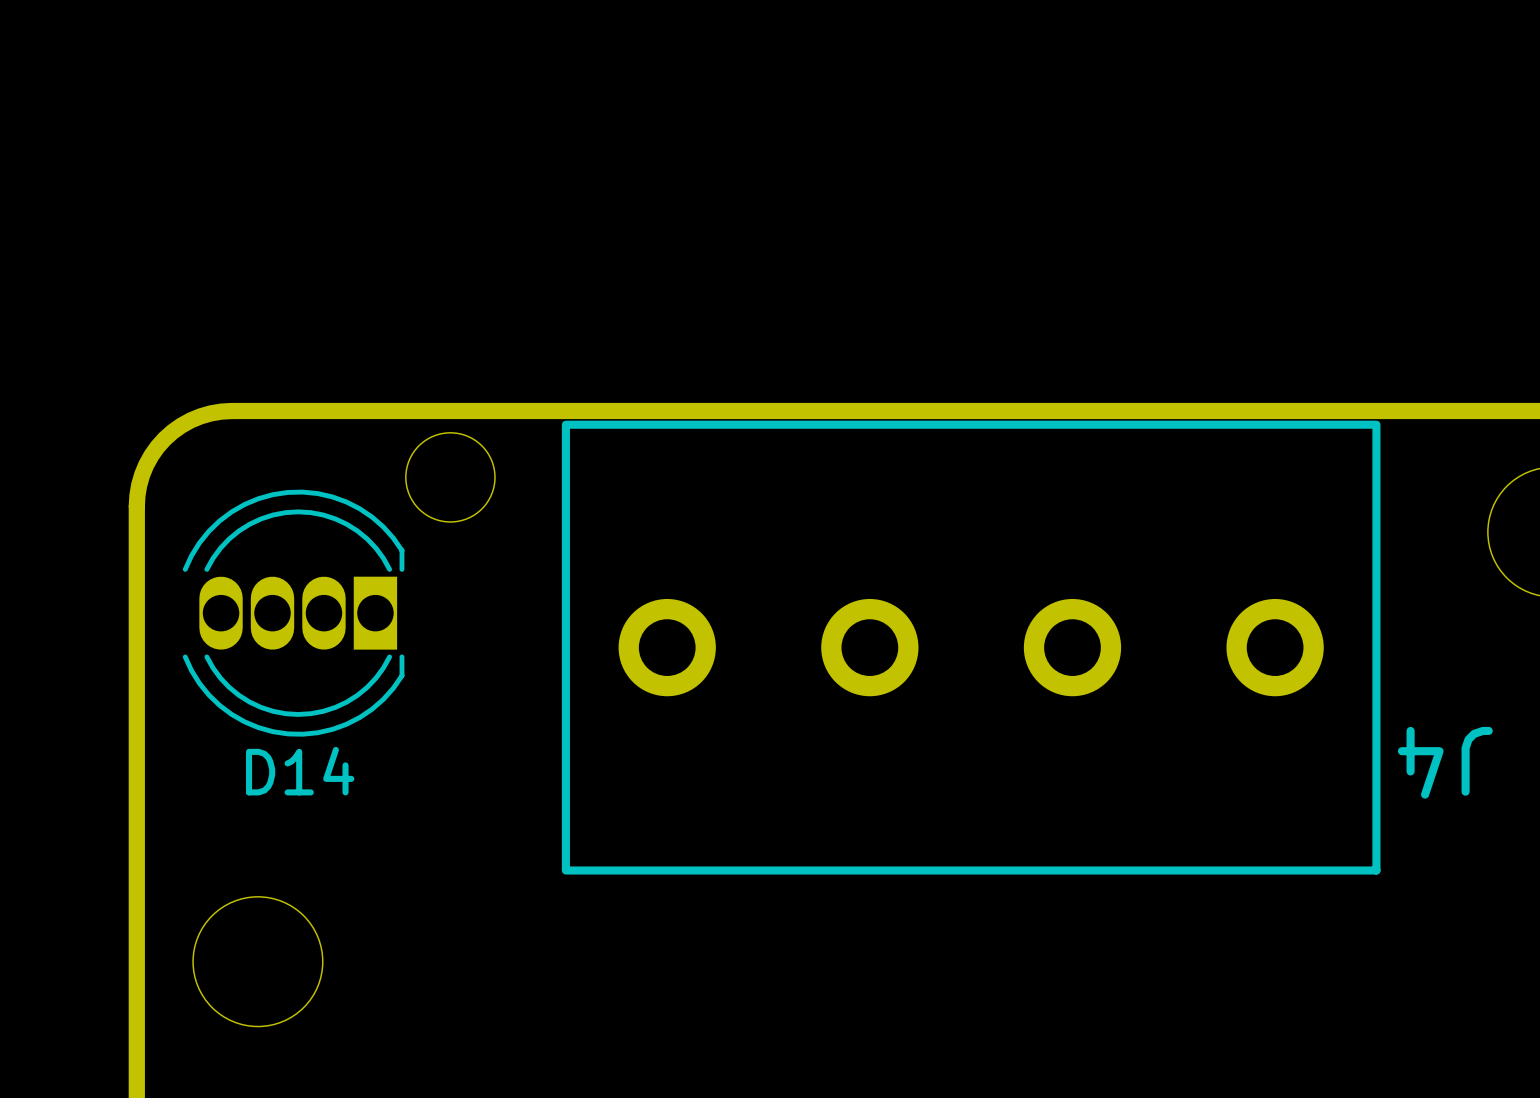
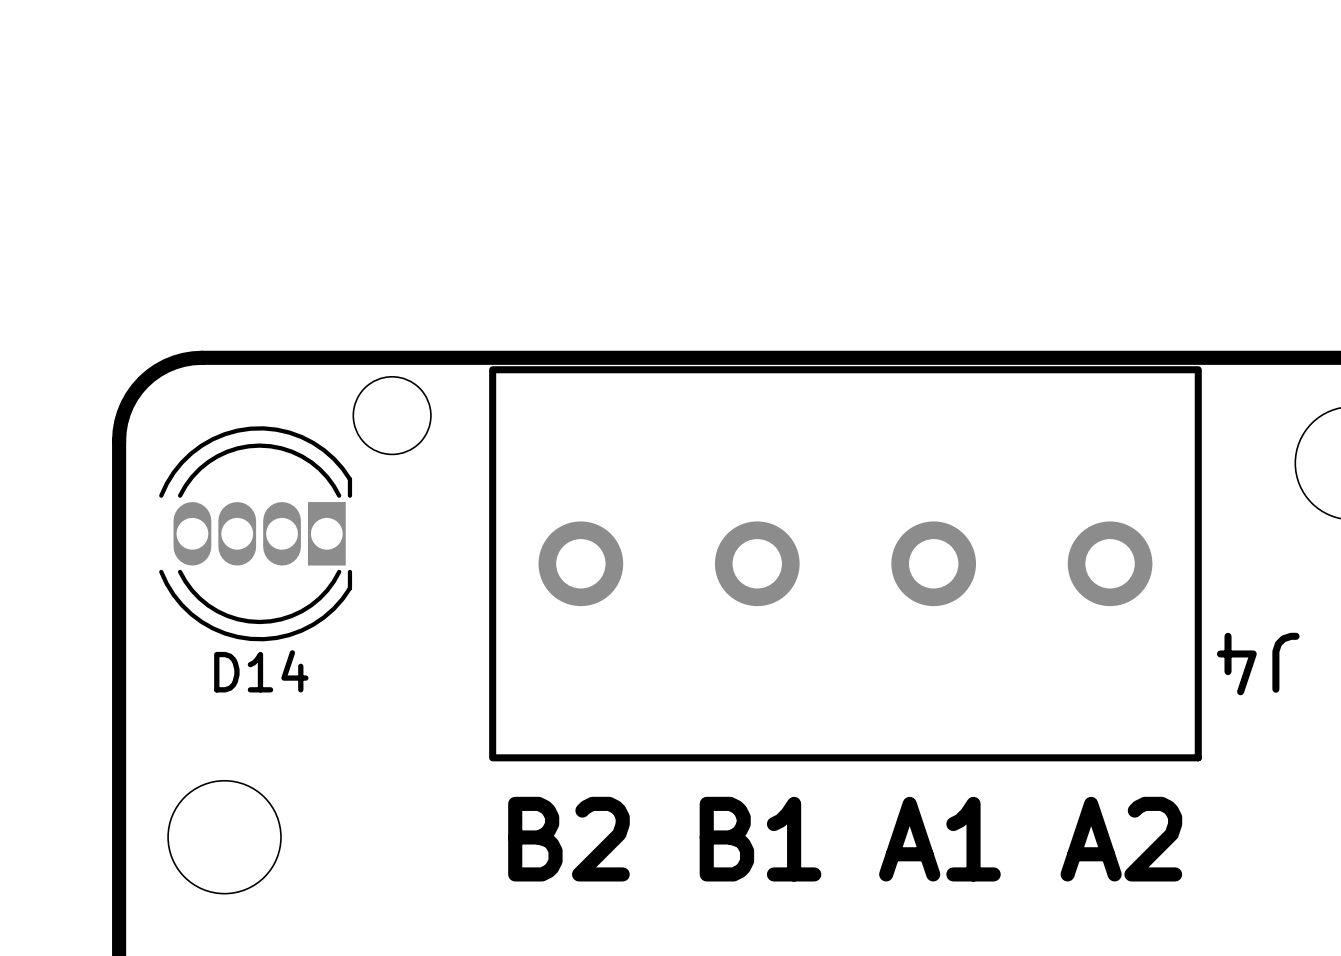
text: none -> B2 B1 (664, 839)
text: none -> A1 A2 (1030, 839)

